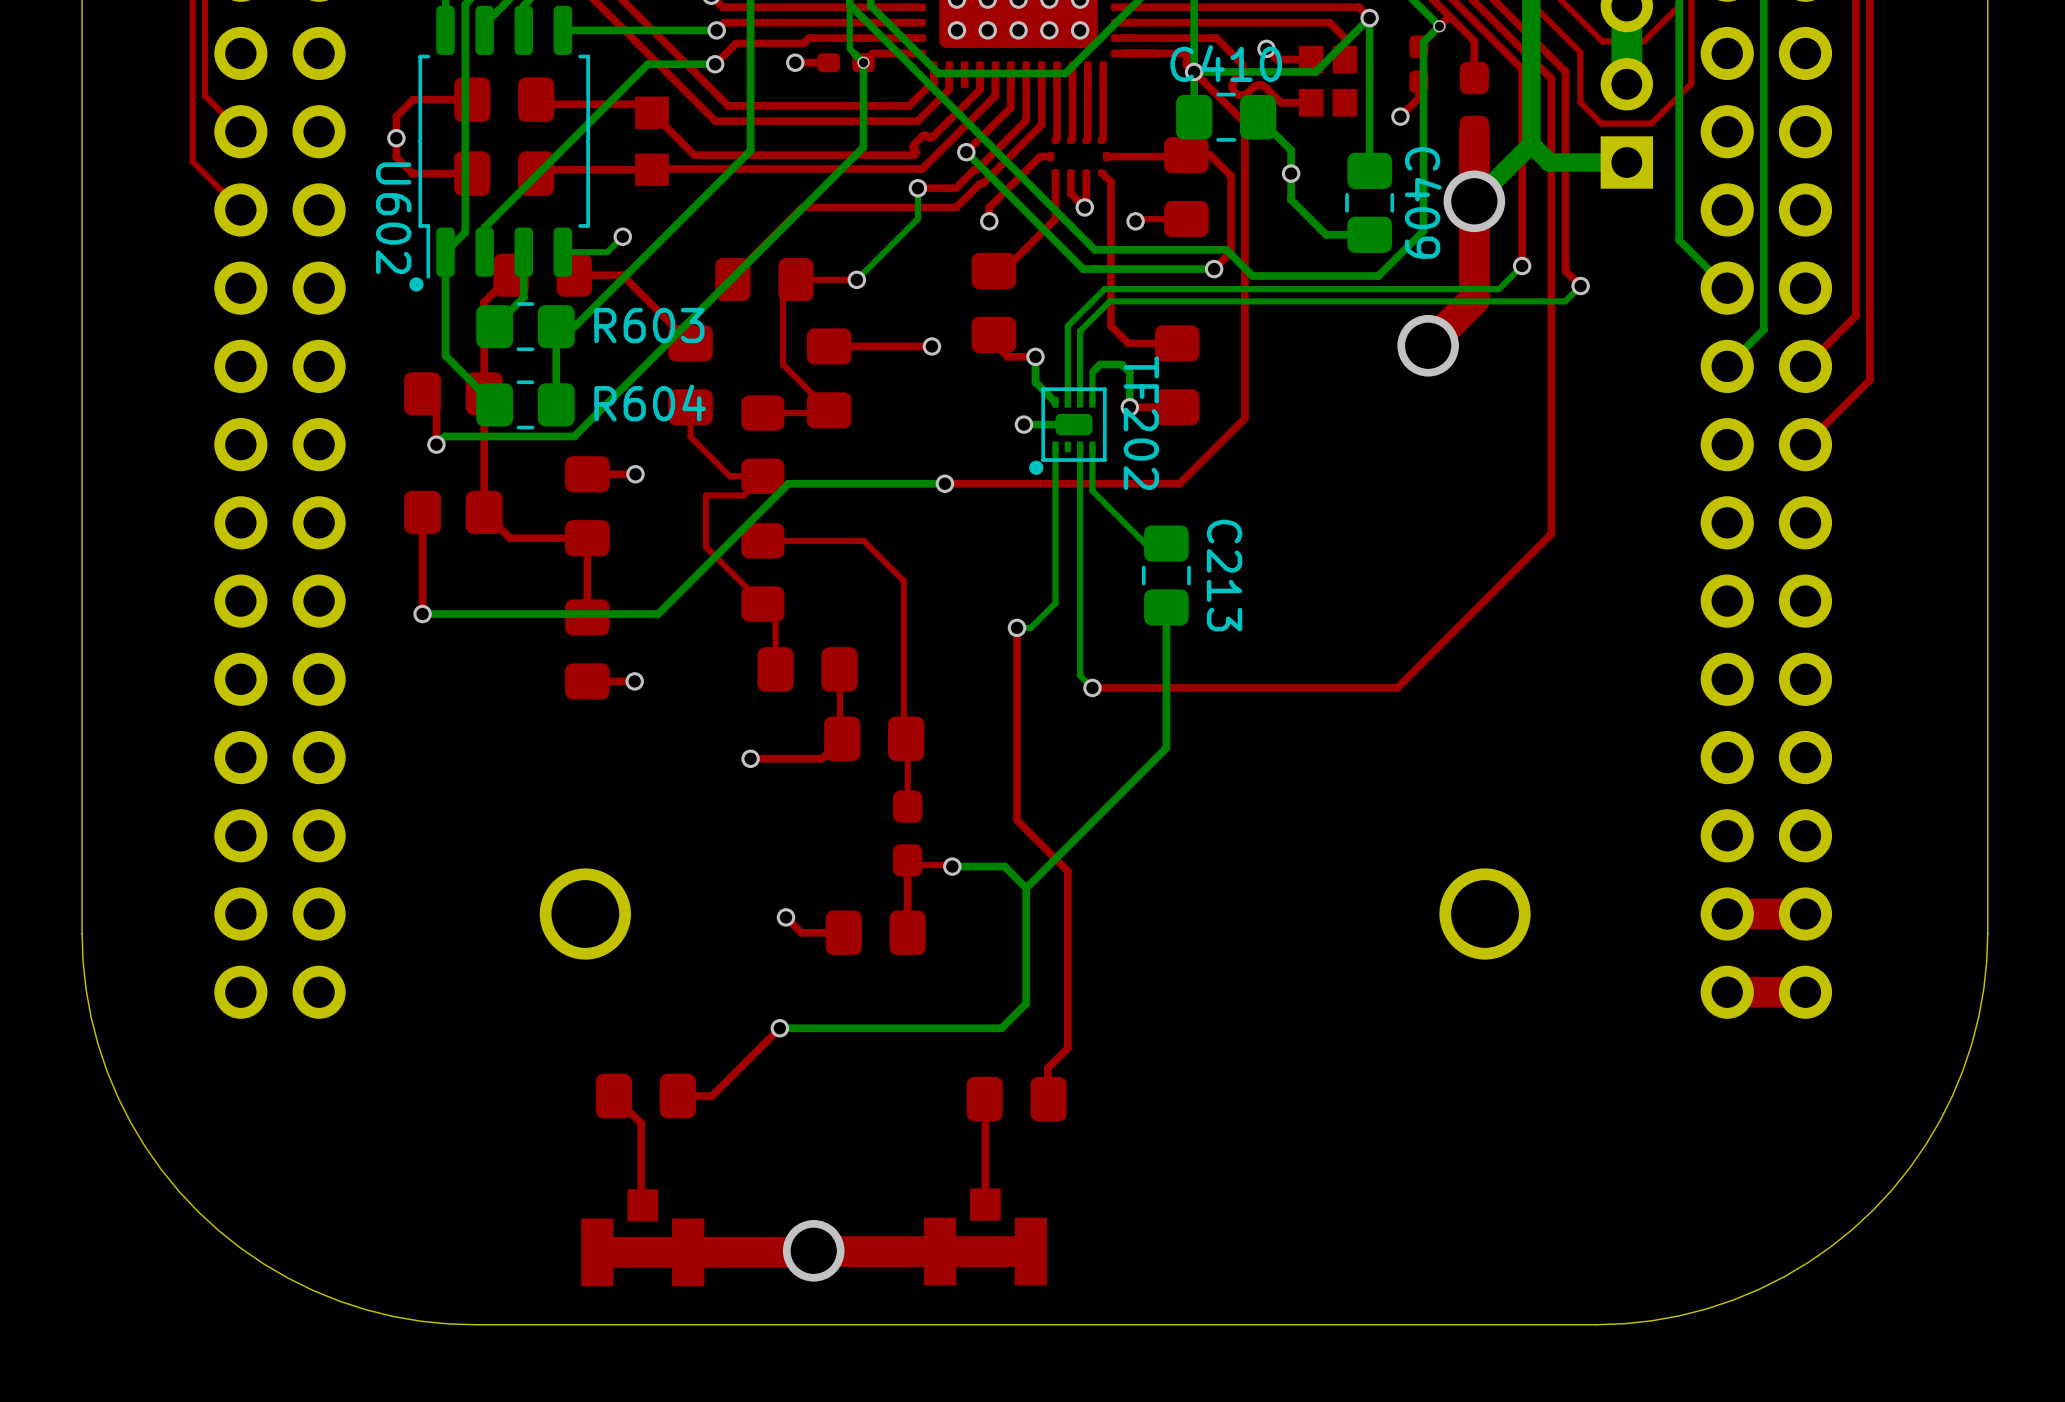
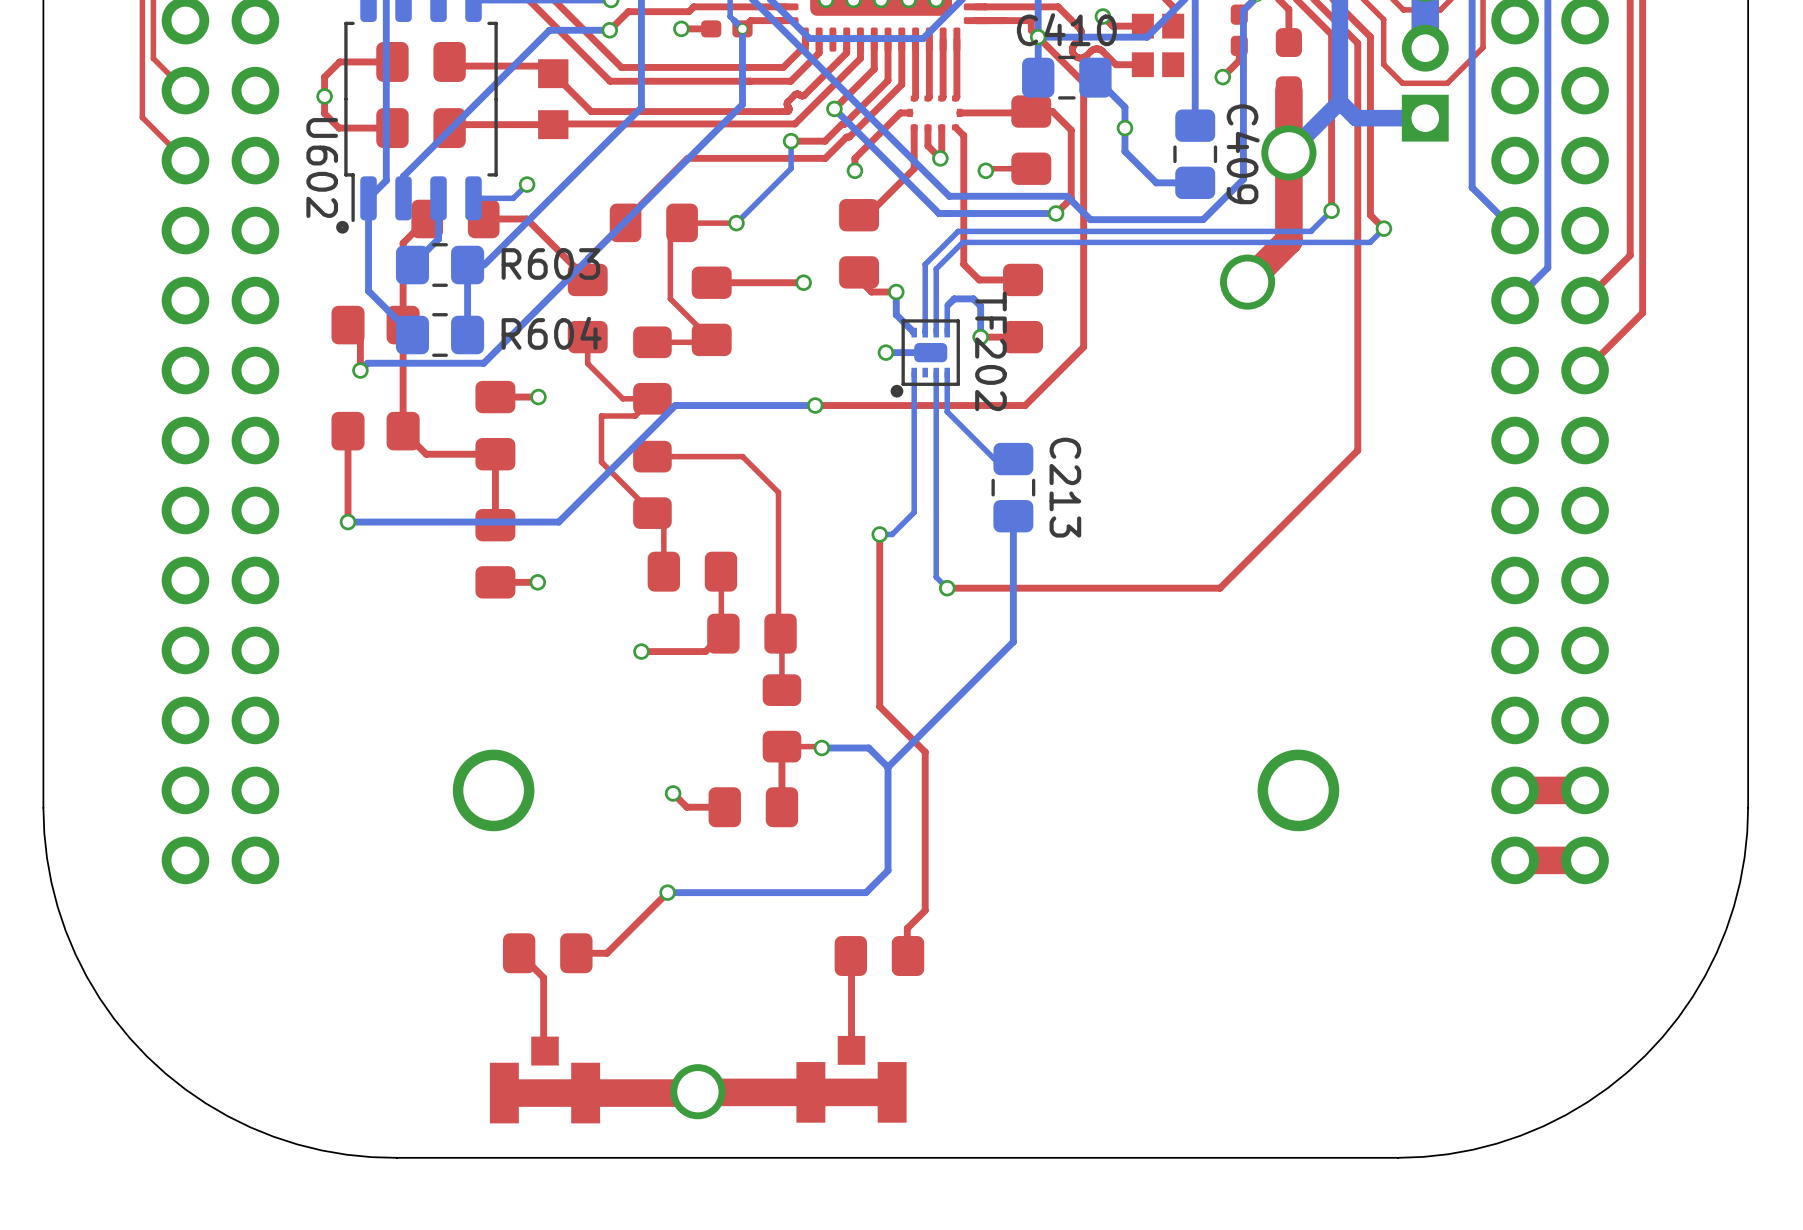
part footprint: [893, 790, 923, 877] -> [762, 674, 802, 763]

